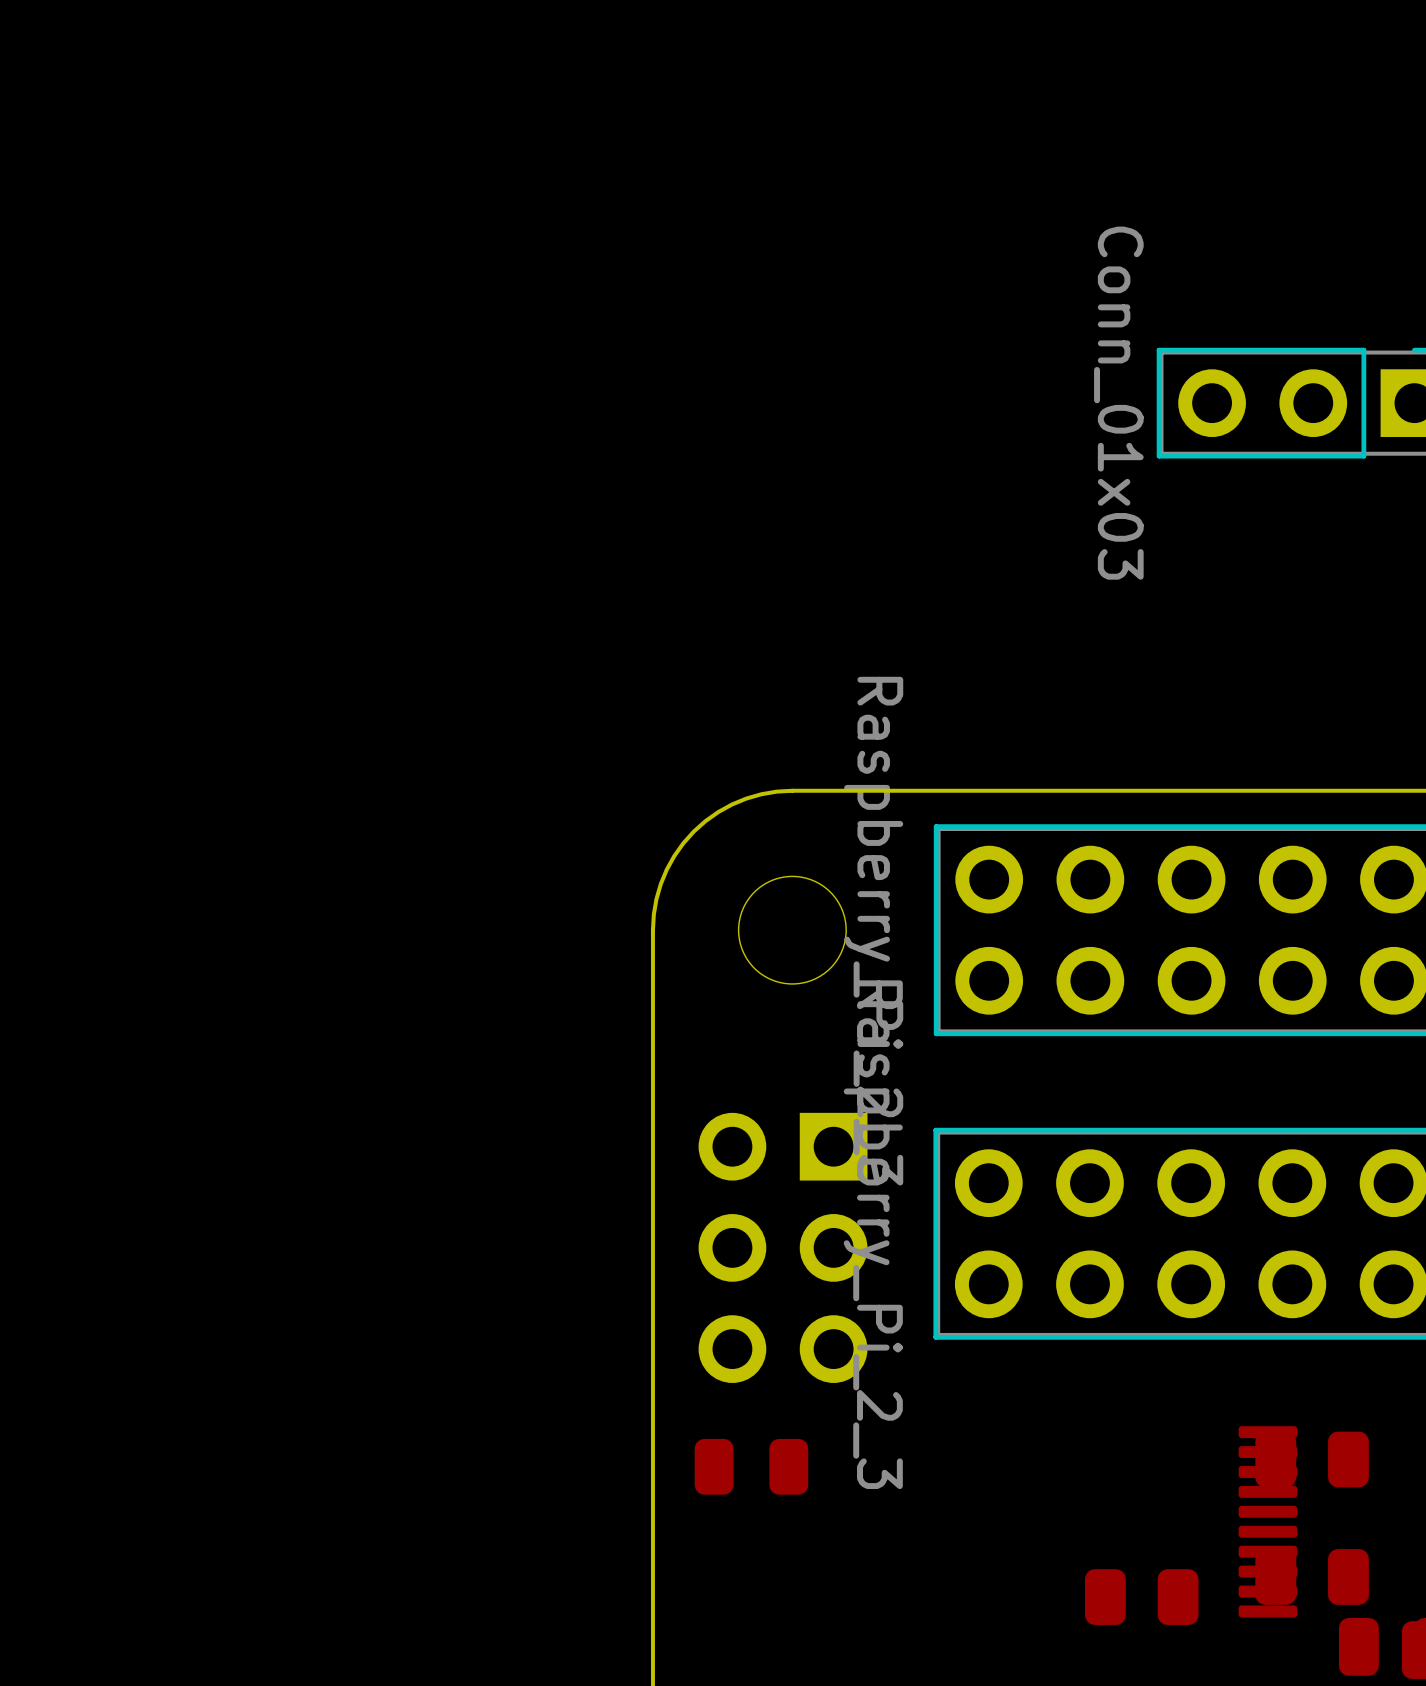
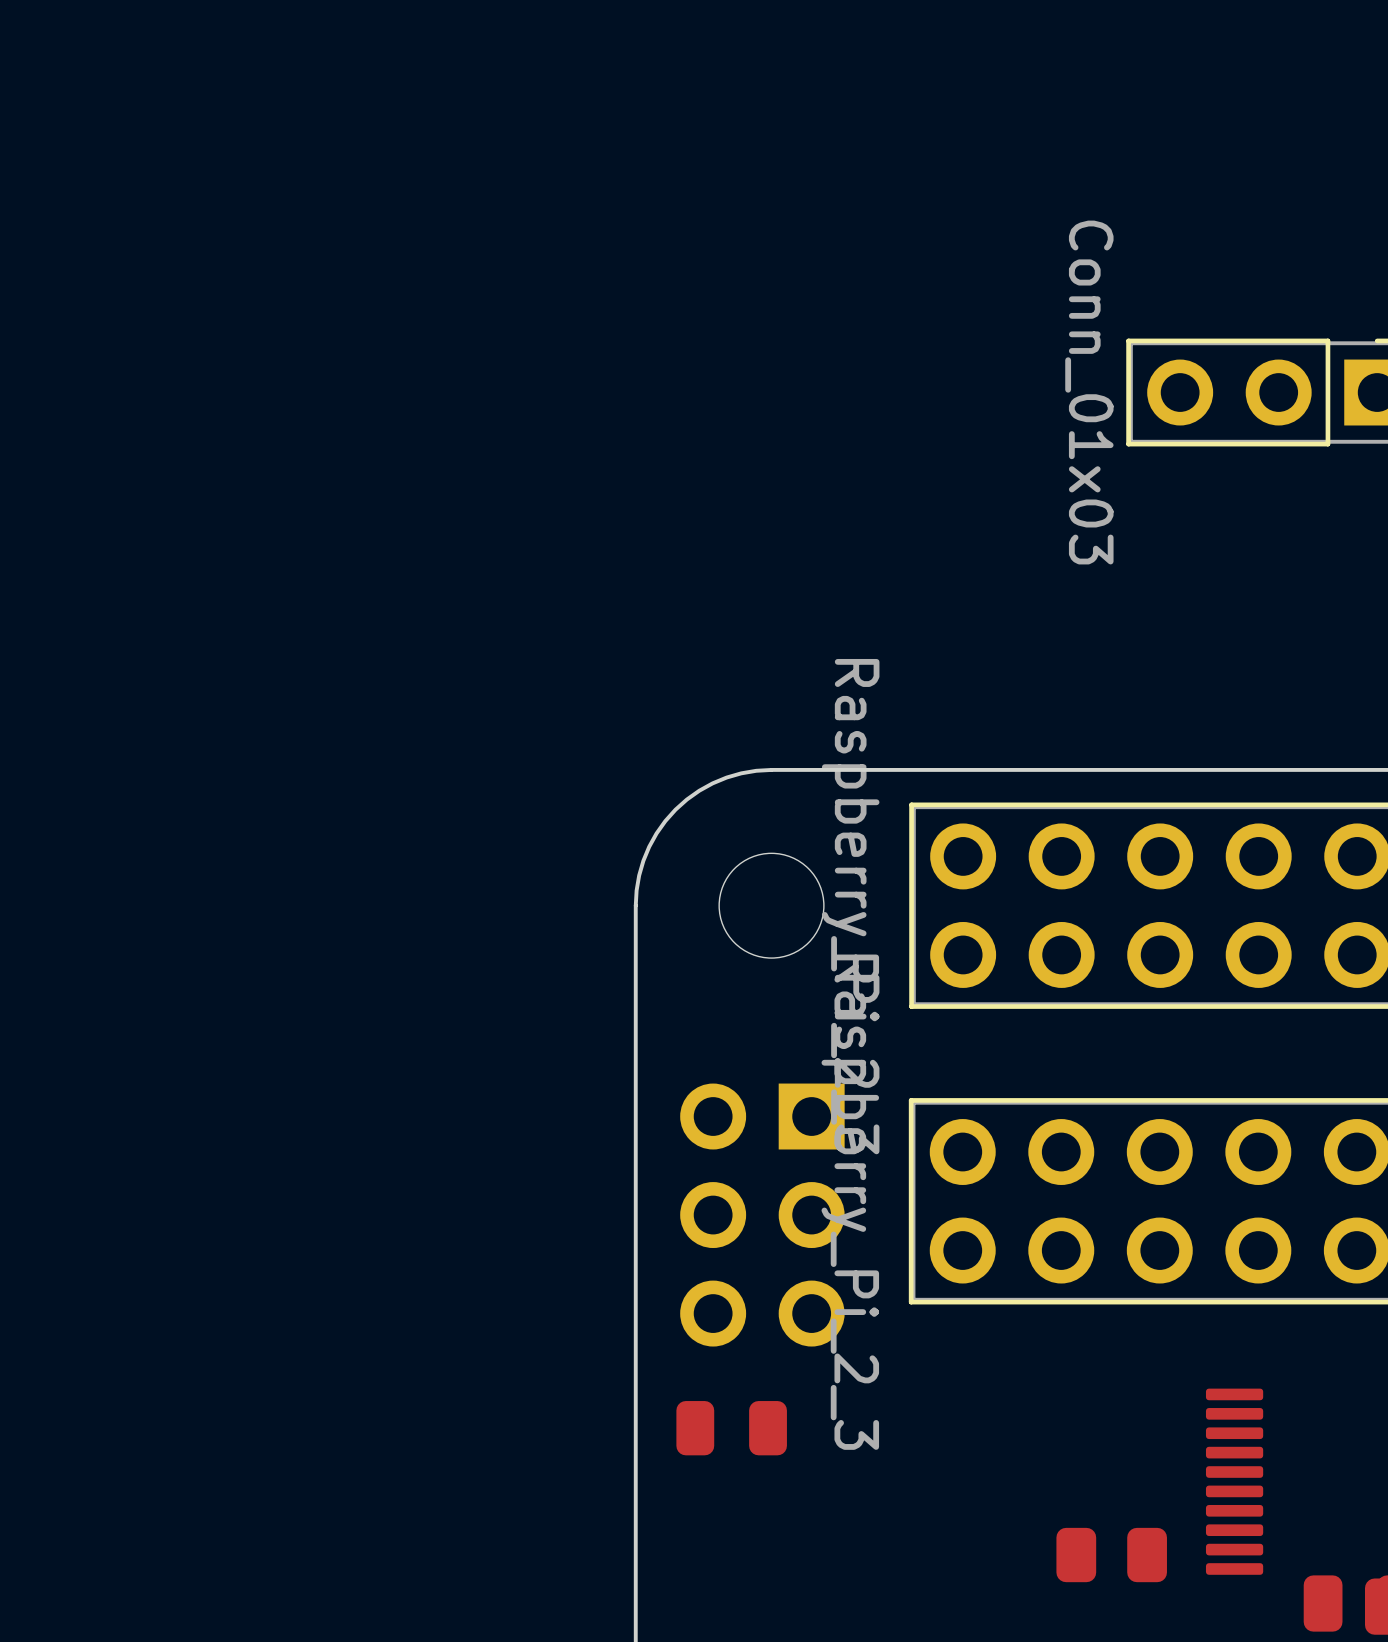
part: (1312, 1459) -> none
part: (1312, 1577) -> none

